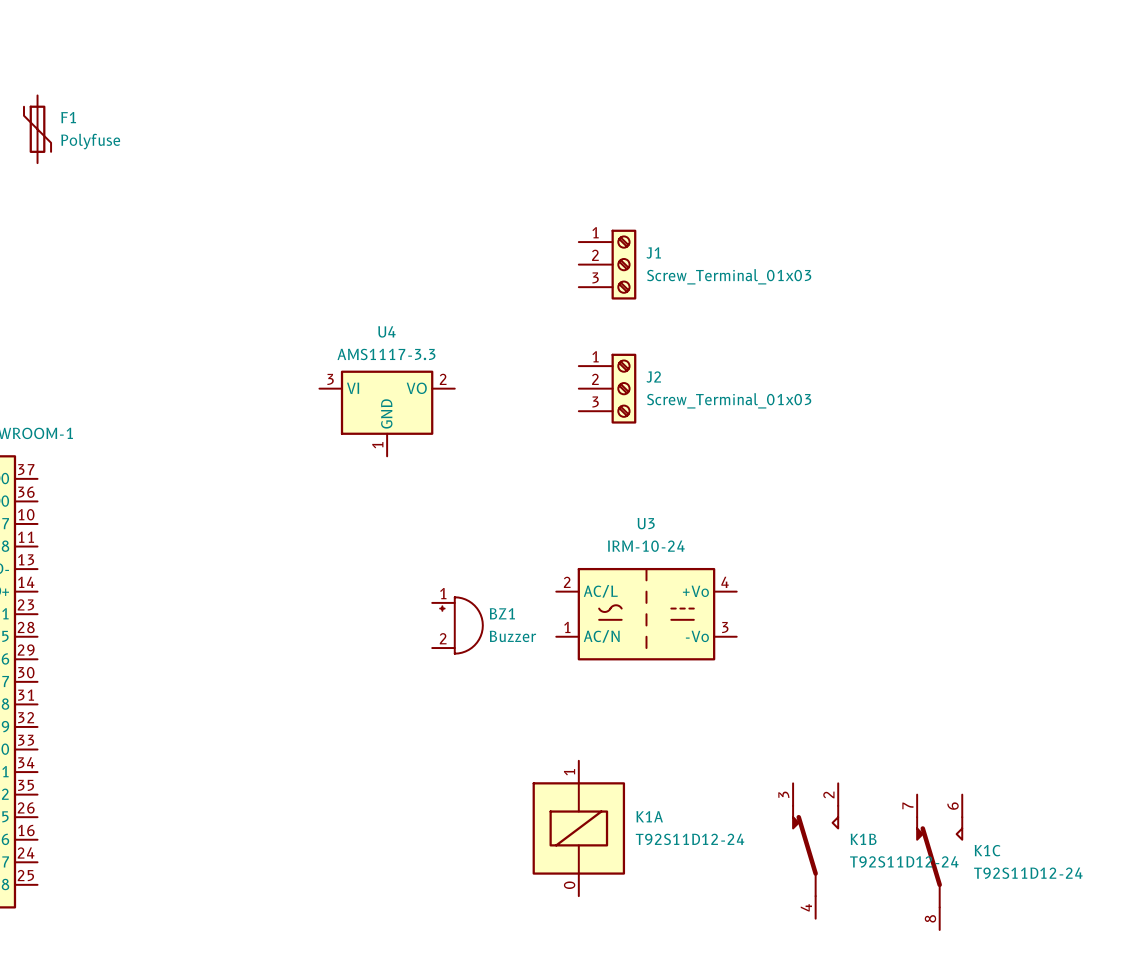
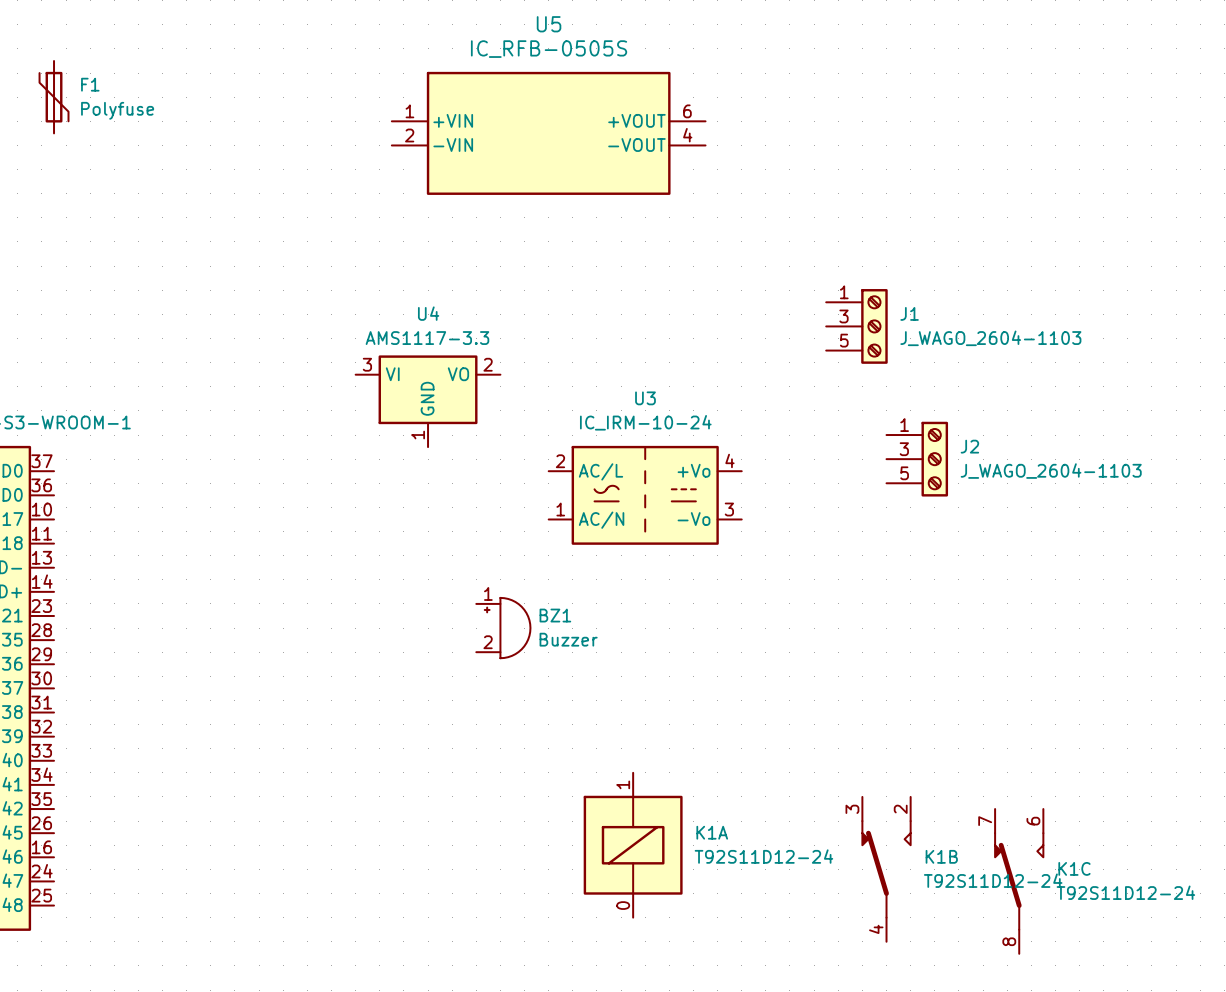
U5: none -> IC_RFB-0505S (548, 133)
J1 pin number: 2 (595, 255) -> 3 (844, 316)
J1 position: (607, 264) -> (856, 326)
J1 value: Screw_Terminal_01x03 (729, 276) -> J_WAGO_2604-1103 (990, 338)
J1 pin number: 3 (595, 277) -> 5 (844, 340)
J2 pin number: 2 (595, 379) -> 3 (904, 449)
J2 position: (607, 388) -> (917, 459)
J2 value: Screw_Terminal_01x03 (729, 400) -> J_WAGO_2604-1103 (1051, 471)
J2 pin number: 3 (595, 401) -> 5 (904, 473)
U3 value: IRM-10-24 (646, 546) -> IC_IRM-10-24 (645, 422)
U3 position: (646, 614) -> (645, 495)

